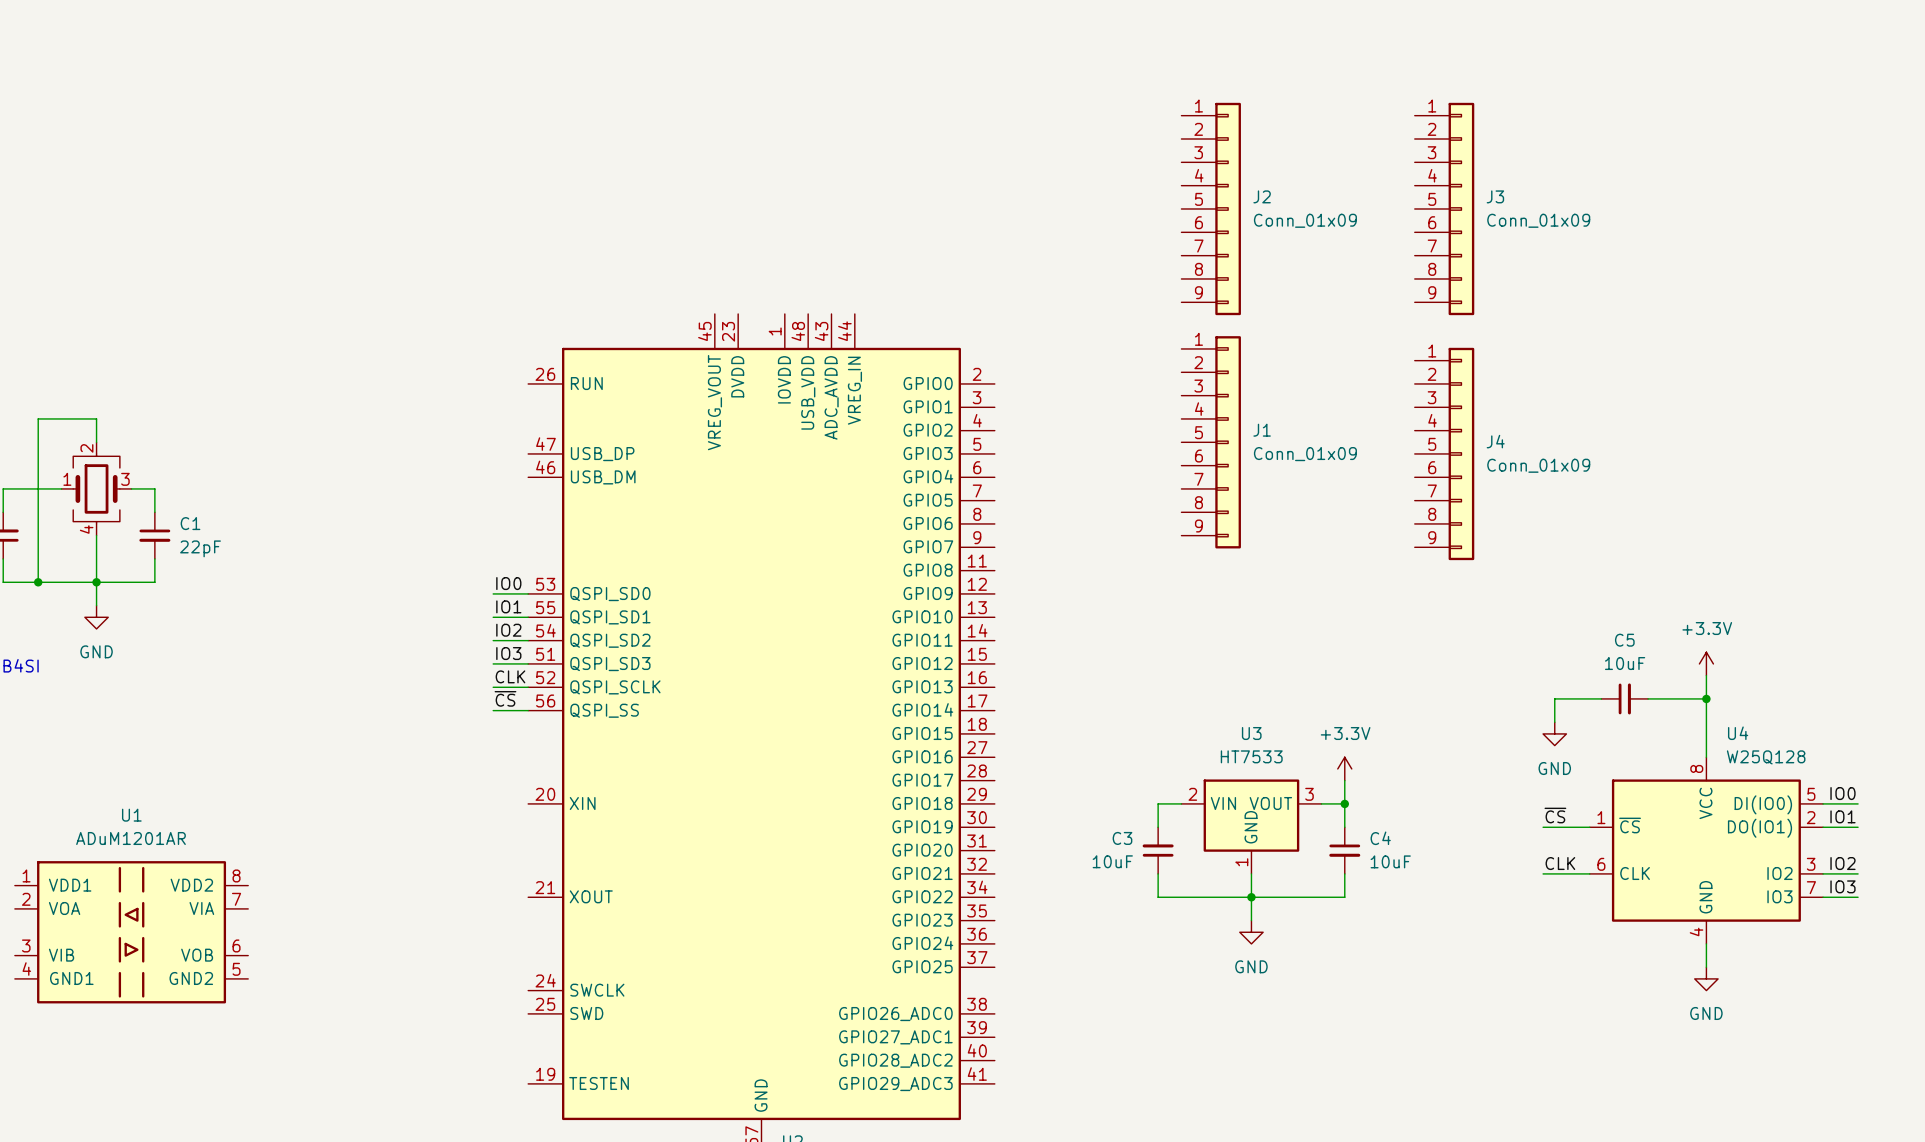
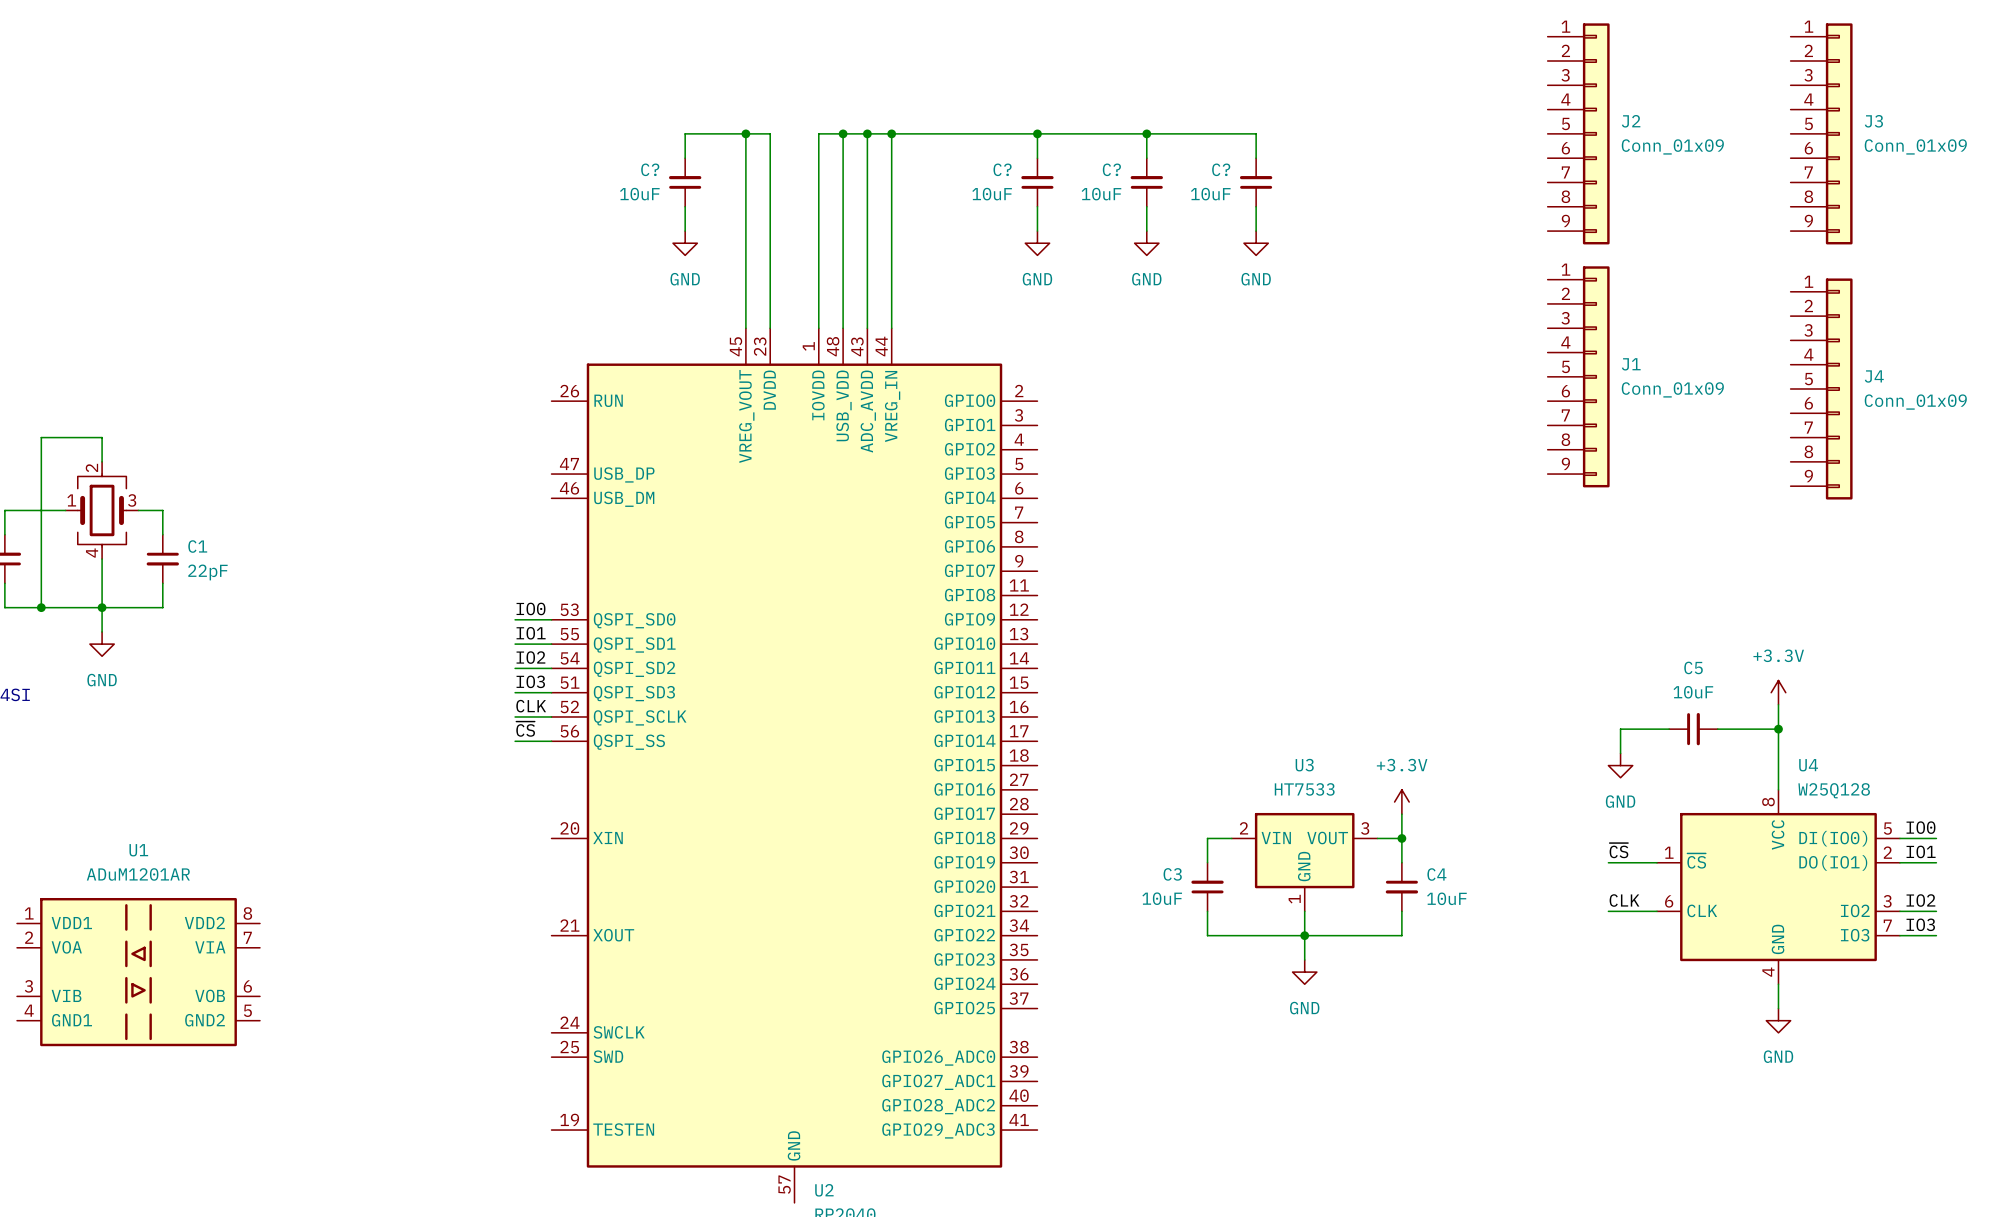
wire: none -> (745, 133) (745, 328)
junction: none -> (745, 133)
wire: none -> (843, 133) (843, 328)
junction: none -> (843, 133)
wire: none -> (867, 133) (867, 328)
junction: none -> (867, 133)
wire: none -> (891, 133) (891, 328)
junction: none -> (891, 133)
wire: none -> (1037, 133) (1037, 158)
junction: none -> (1037, 133)
wire: none -> (1146, 133) (1146, 158)
junction: none -> (1146, 133)
wire: none -> (685, 158) (685, 133) (770, 133) (770, 328)
wire: none -> (1256, 158) (1256, 133) (818, 133) (818, 328)
C?: none -> 10uF (685, 182)
C?: none -> 10uF (1037, 182)
C?: none -> 10uF (1146, 182)
C?: none -> 10uF (1256, 182)
wire: none -> (685, 206) (685, 231)
wire: none -> (1037, 206) (1037, 231)
wire: none -> (1146, 206) (1146, 231)
wire: none -> (1256, 206) (1256, 231)
J2 position: (1211, 208) -> (1578, 133)
J3 position: (1444, 208) -> (1821, 133)
power symbol: none -> GND (685, 243)
power symbol: none -> GND (1037, 243)
power symbol: none -> GND (1146, 243)
power symbol: none -> GND (1256, 243)
J1 position: (1211, 442) -> (1578, 376)
J4 position: (1444, 453) -> (1821, 388)

